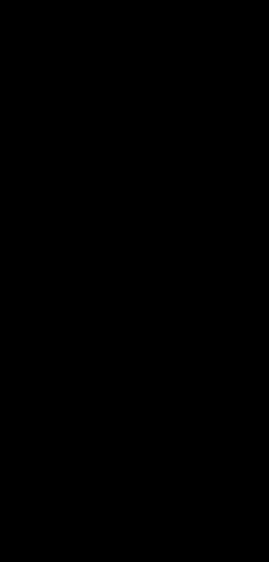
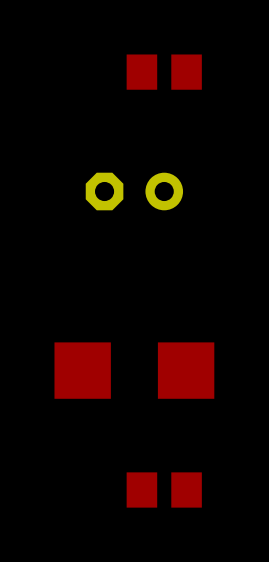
part: none -> (164, 72)
part: none -> (134, 191)
part: none -> (134, 370)
part: none -> (164, 489)

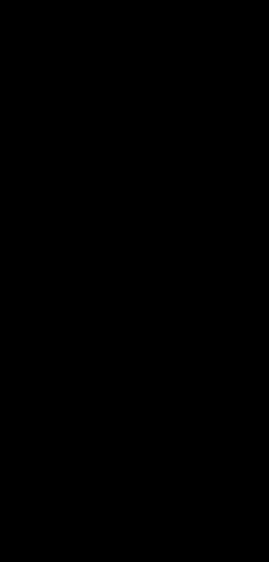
part: (164, 72) -> none
part: (134, 191) -> none
part: (134, 370) -> none
part: (164, 489) -> none

